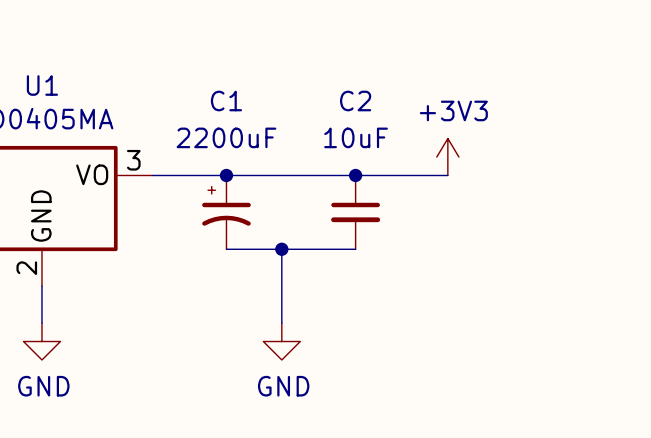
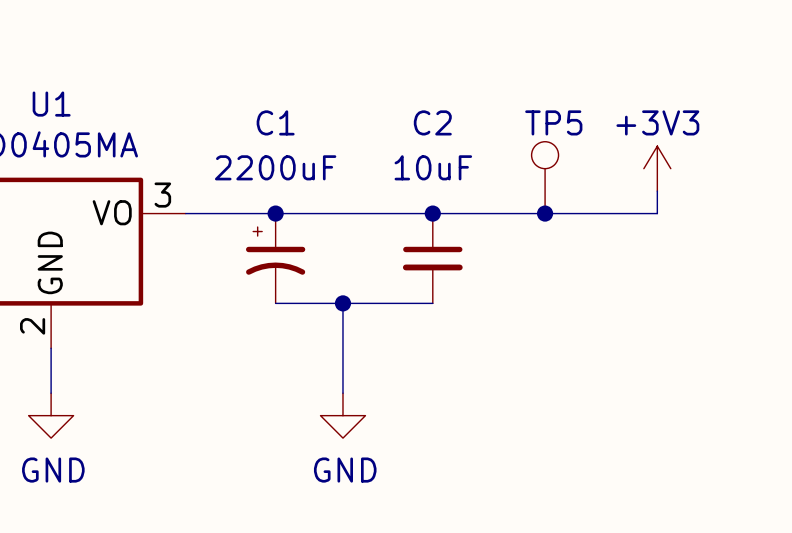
power symbol text position: +3V3 (453, 110) -> +3V3 (657, 122)
TP5: none -> (545, 177)
power symbol position: +3V3 (447, 157) -> +3V3 (657, 168)
wire: none -> (657, 191) (657, 213) (545, 213)
junction: none -> (545, 213)

